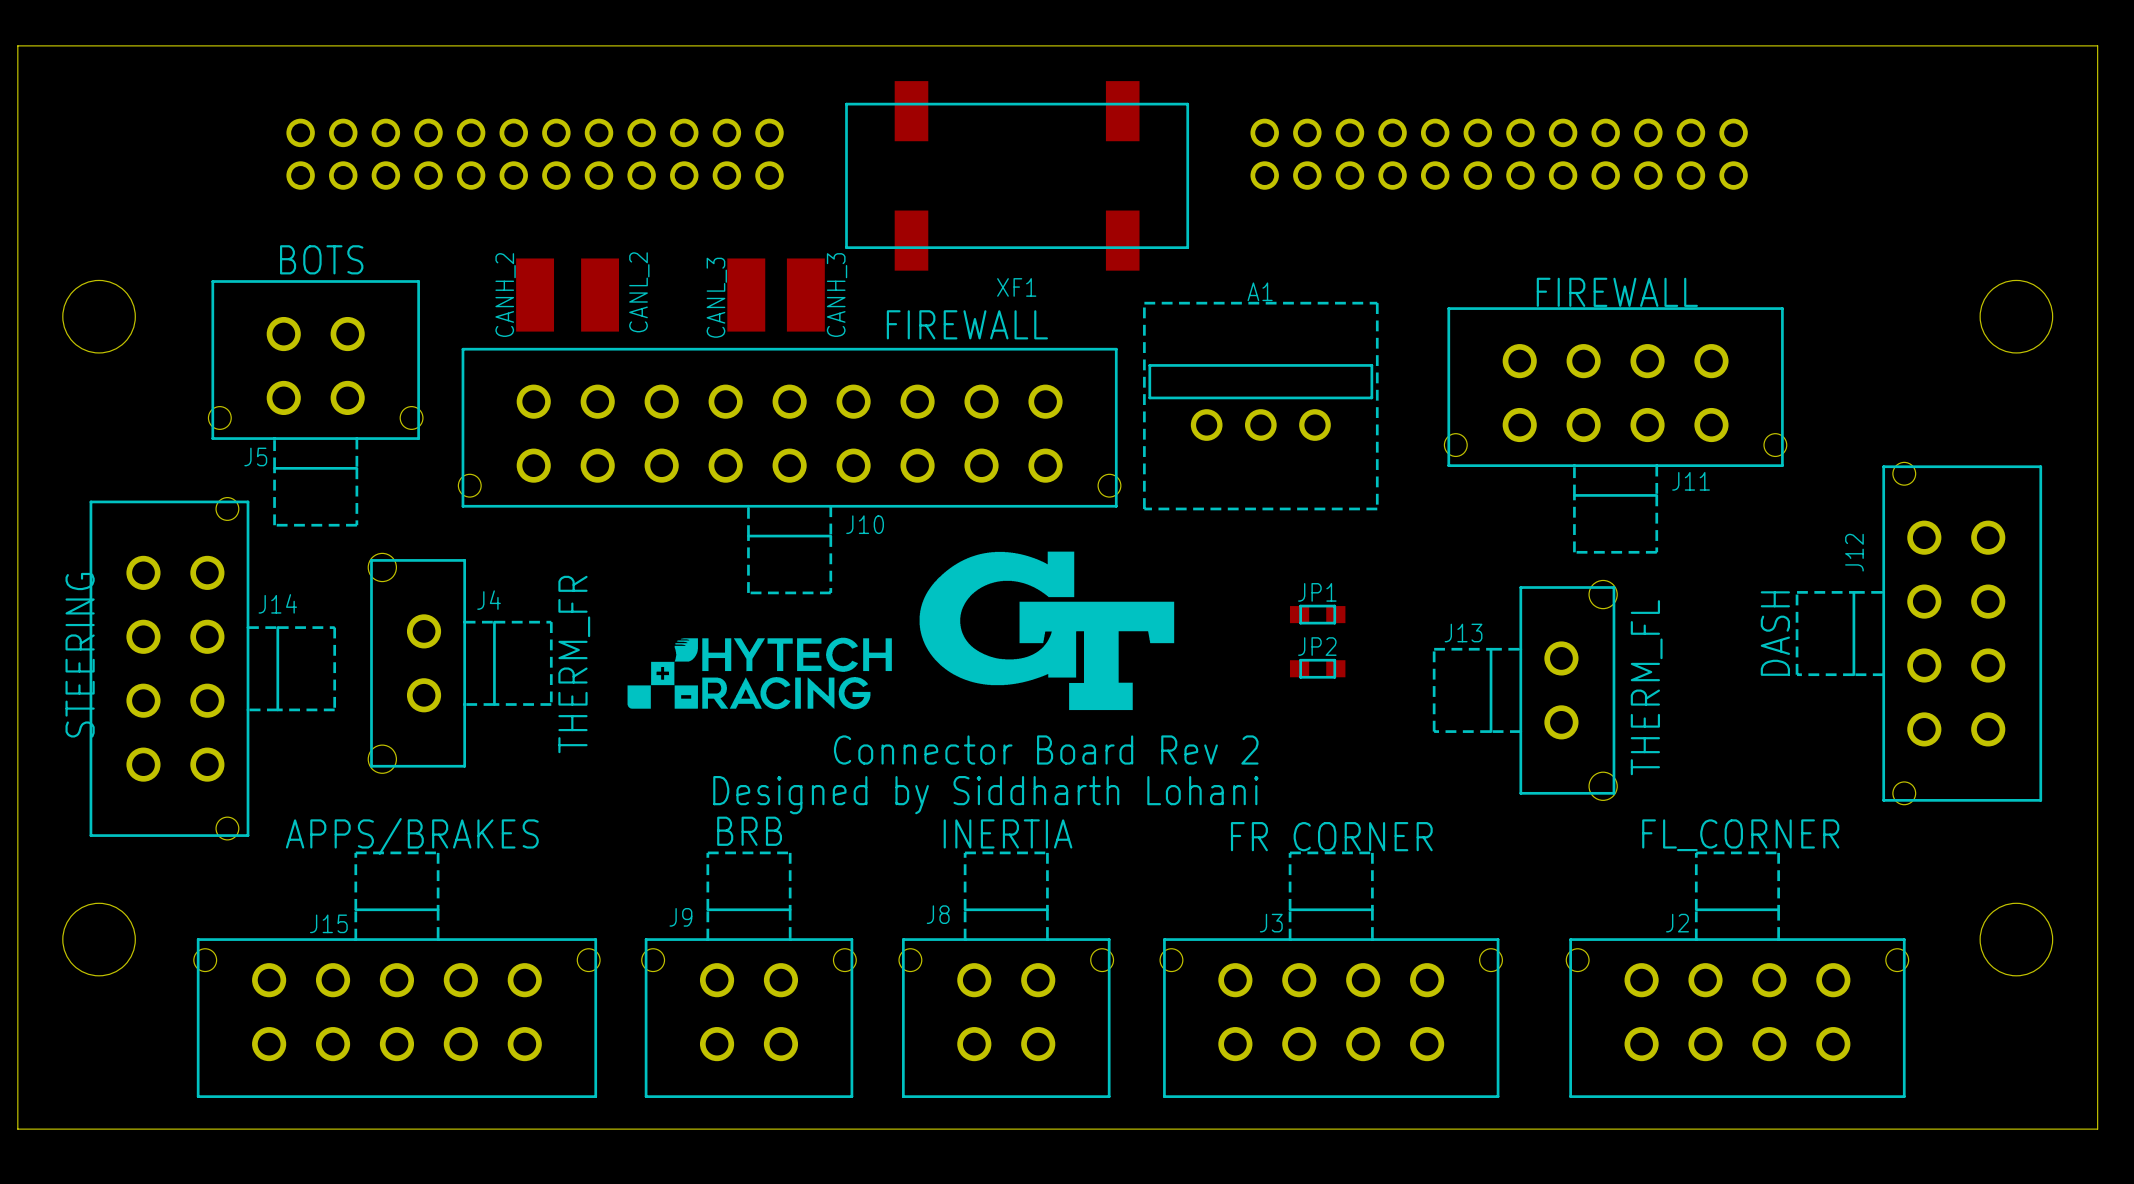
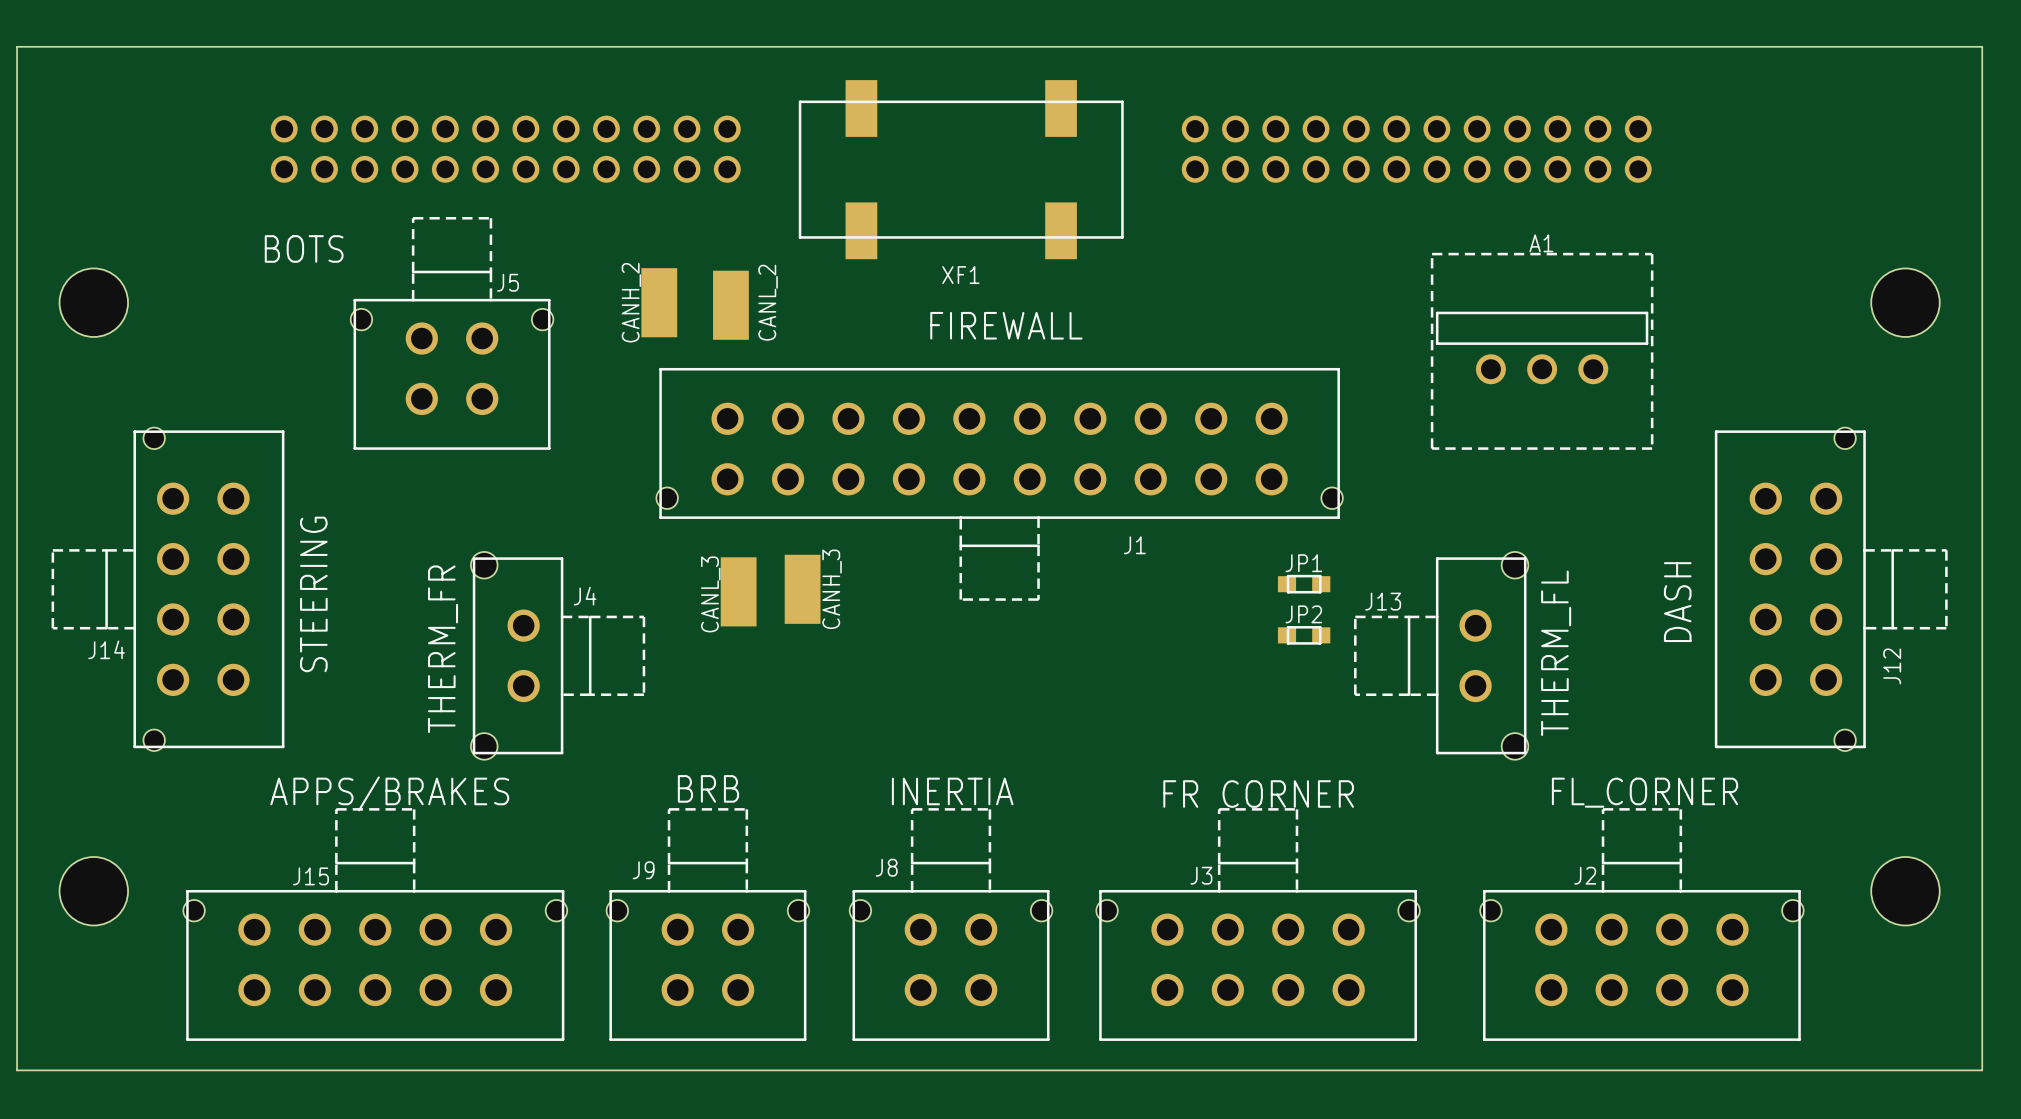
text: FIREWALL (1617, 292) -> none
CANH_2 position: (535, 295) -> (659, 302)
CANL_2 position: (600, 295) -> (730, 305)
CANL_3 position: (746, 295) -> (738, 591)
CANH_3 position: (805, 295) -> (802, 589)
text position: FIREWALL (967, 324) -> FIREWALL (1006, 325)
J5 rotation: 0° (315, 403) -> 180° (452, 333)
J5 position: (315, 403) -> (452, 333)
A1 position: (1260, 406) -> (1542, 351)
J11: (1615, 430) -> none
J10: (789, 471) -> none
J1: none -> (999, 484)
drawing: [919, 551, 1175, 711] -> none
JP1 position: (1317, 614) -> (1304, 584)
J12 rotation: 0° (1918, 633) -> 180° (1831, 589)
drawing: [627, 637, 892, 710] -> none
text position: STEERING (80, 655) -> STEERING (313, 594)
J4 position: (460, 663) -> (558, 655)
text position: THERM_FR (574, 664) -> THERM_FR (443, 649)
J14 rotation: 0° (212, 668) -> 180° (167, 589)
JP2 position: (1317, 668) -> (1304, 635)
text: Connector Board Rev 2 (1046, 749) -> none
text: Designed by Siddharth Lohani (985, 795) -> none

